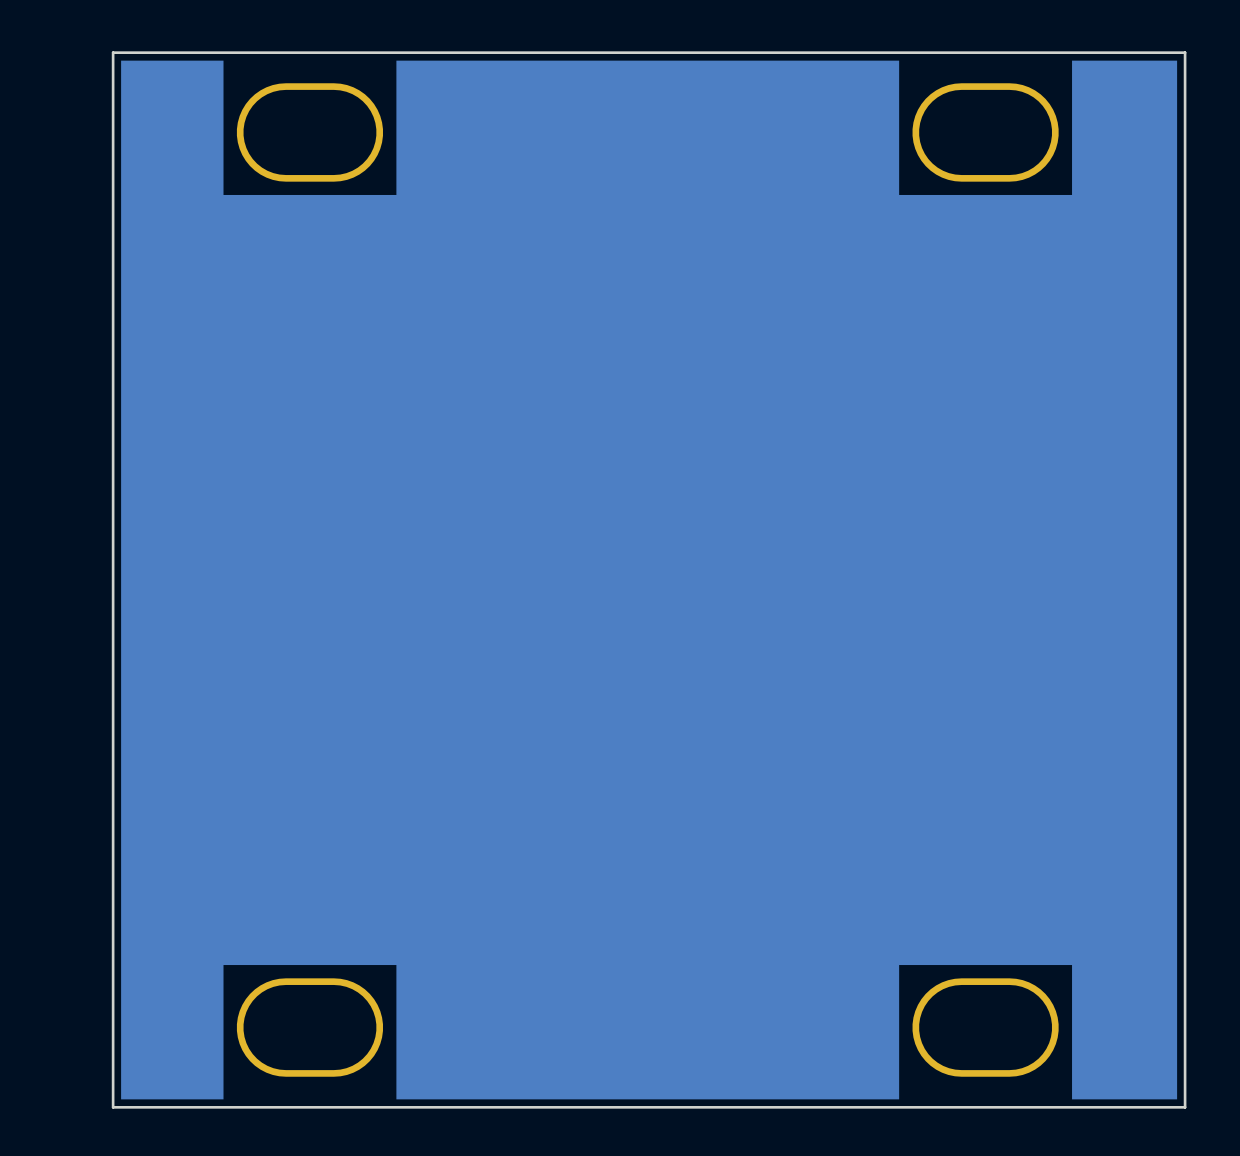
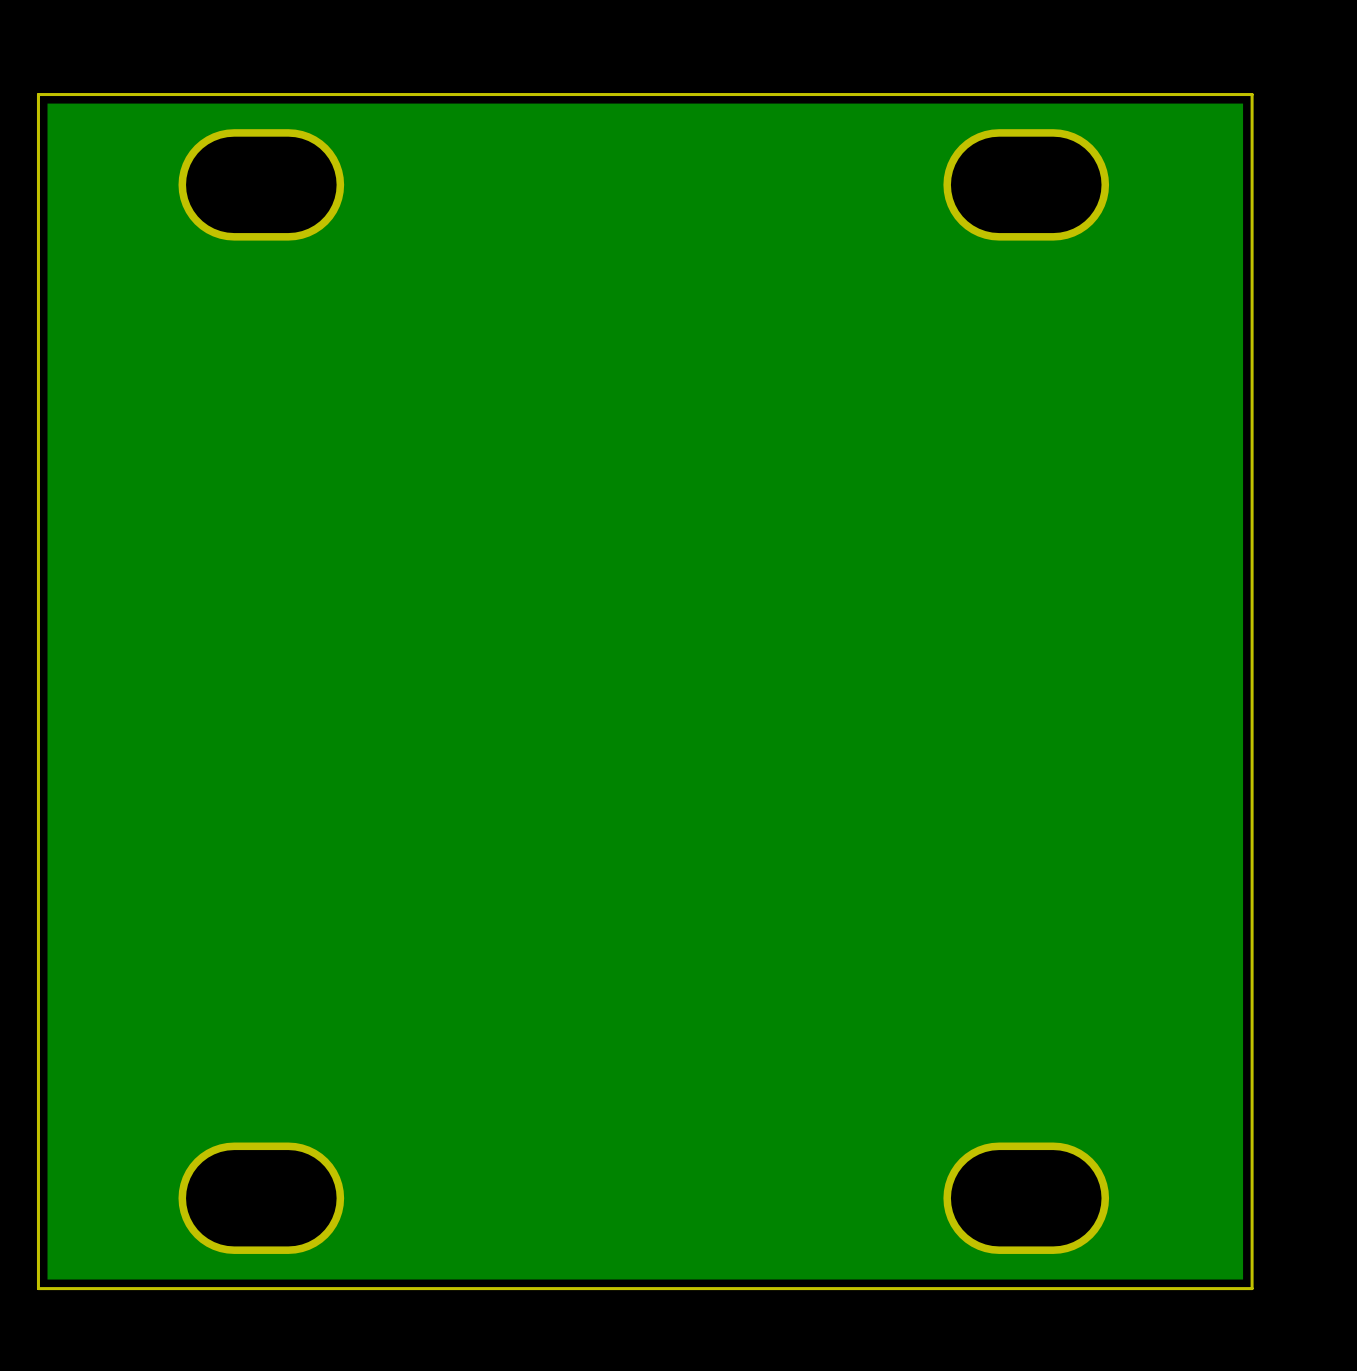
drawing: [121, 60, 224, 1100] -> none
drawing: [396, 60, 900, 195] -> none
drawing: [1072, 60, 1178, 1100] -> none
drawing shape: [223, 194, 1073, 966] -> [47, 103, 1244, 1280]
drawing: [396, 965, 900, 1100] -> none

